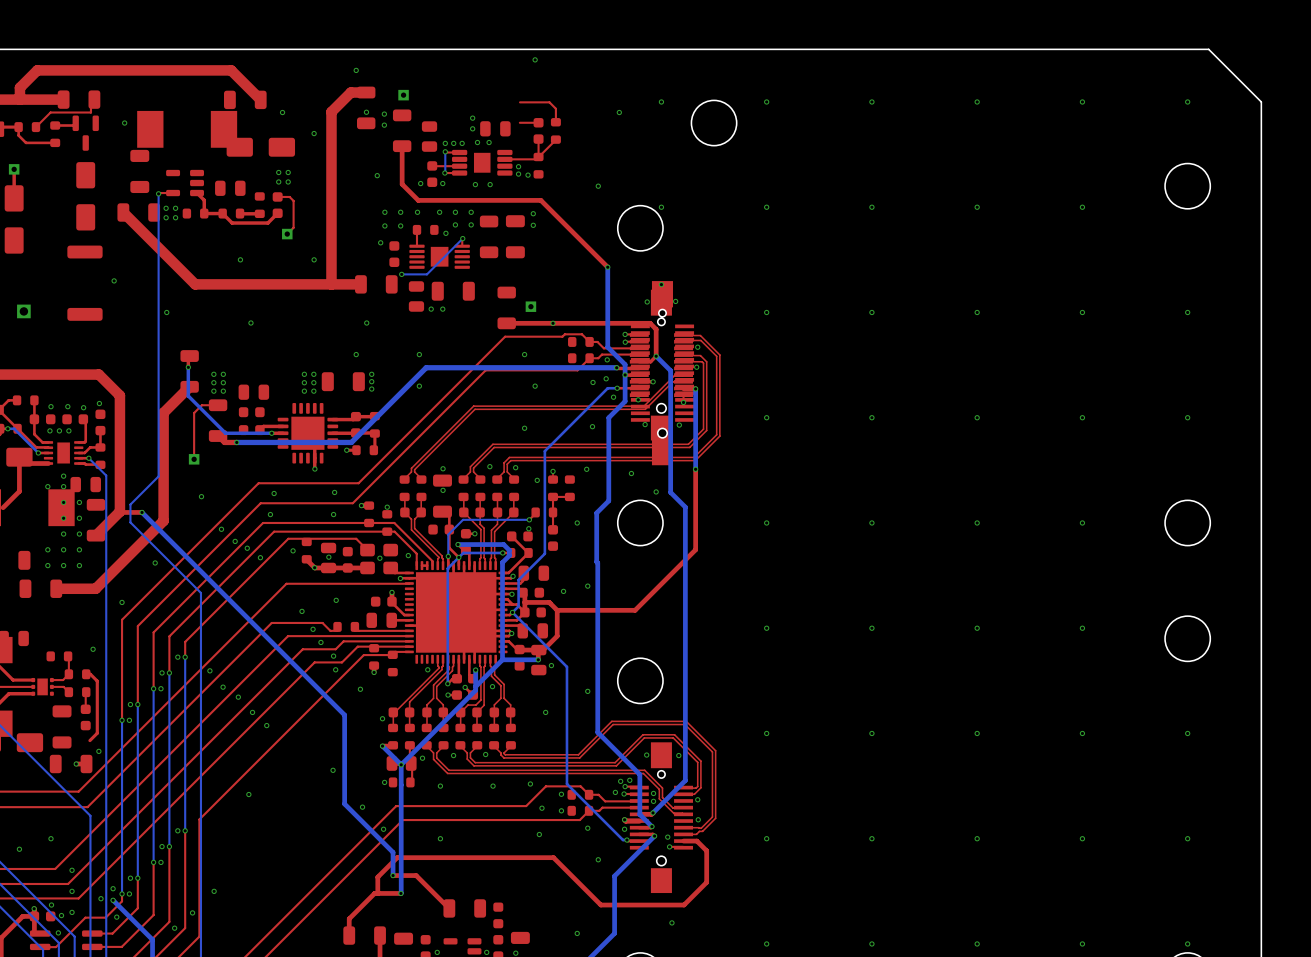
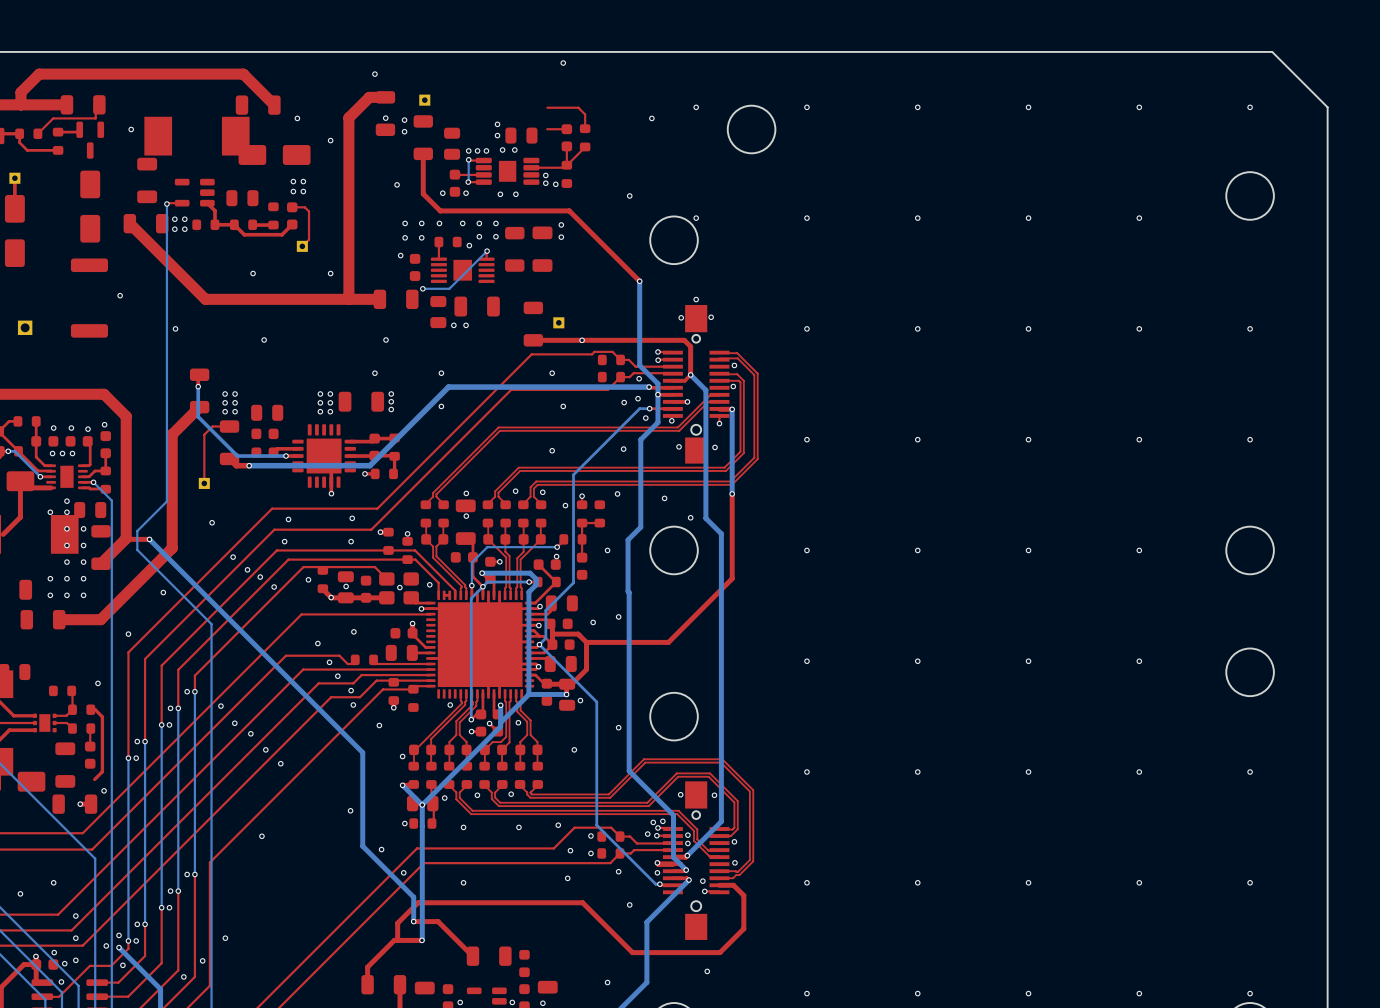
part: (662, 373) -> none

